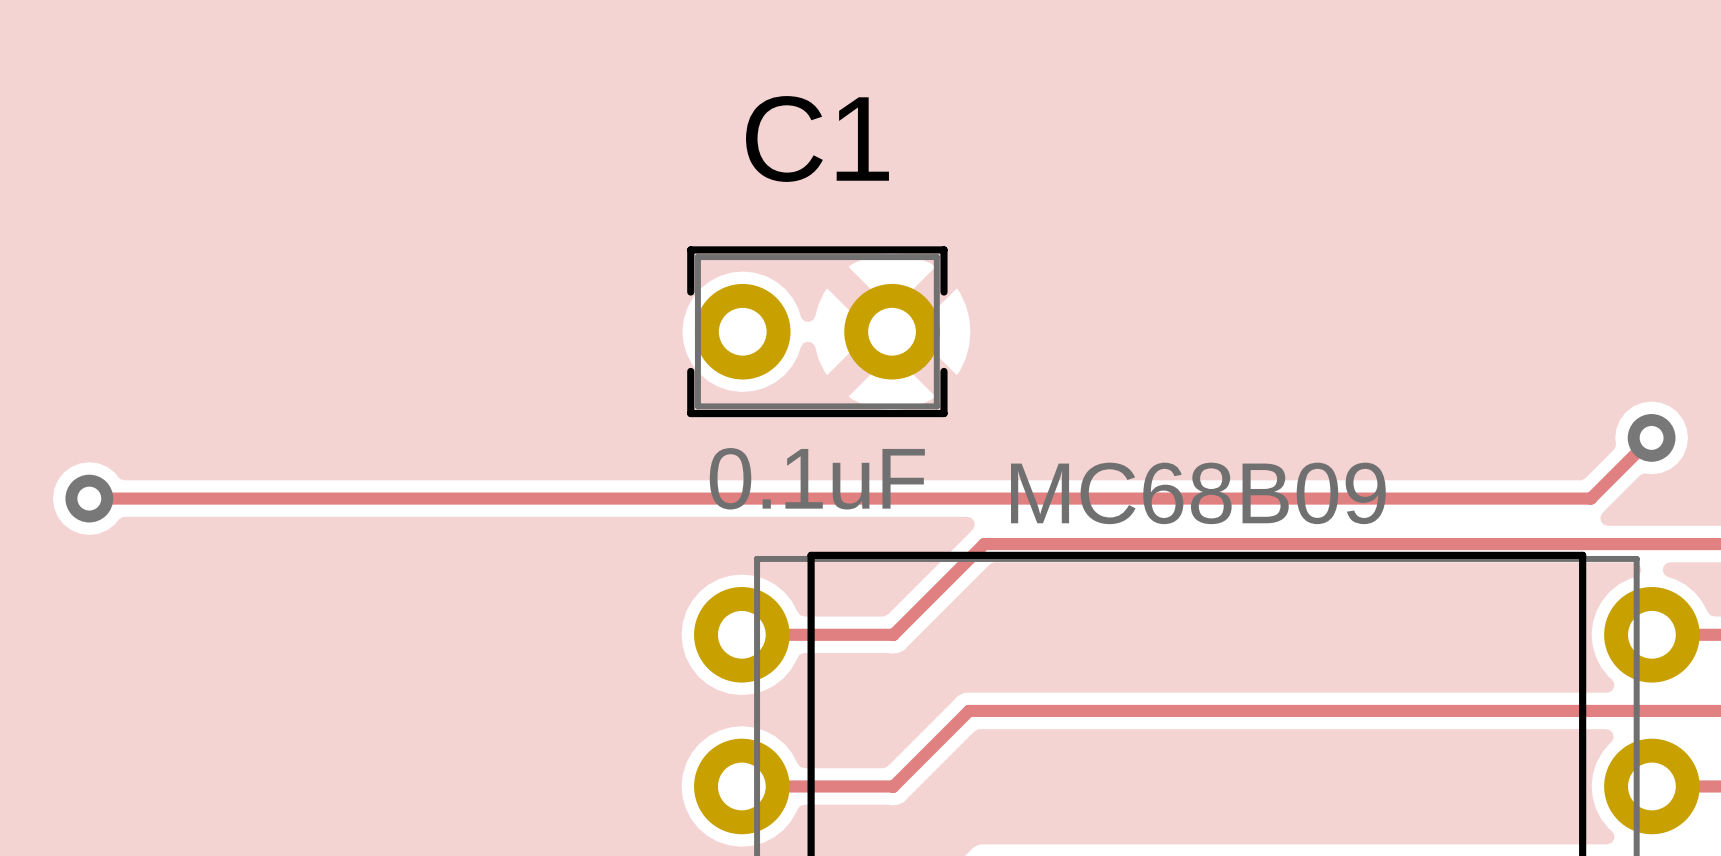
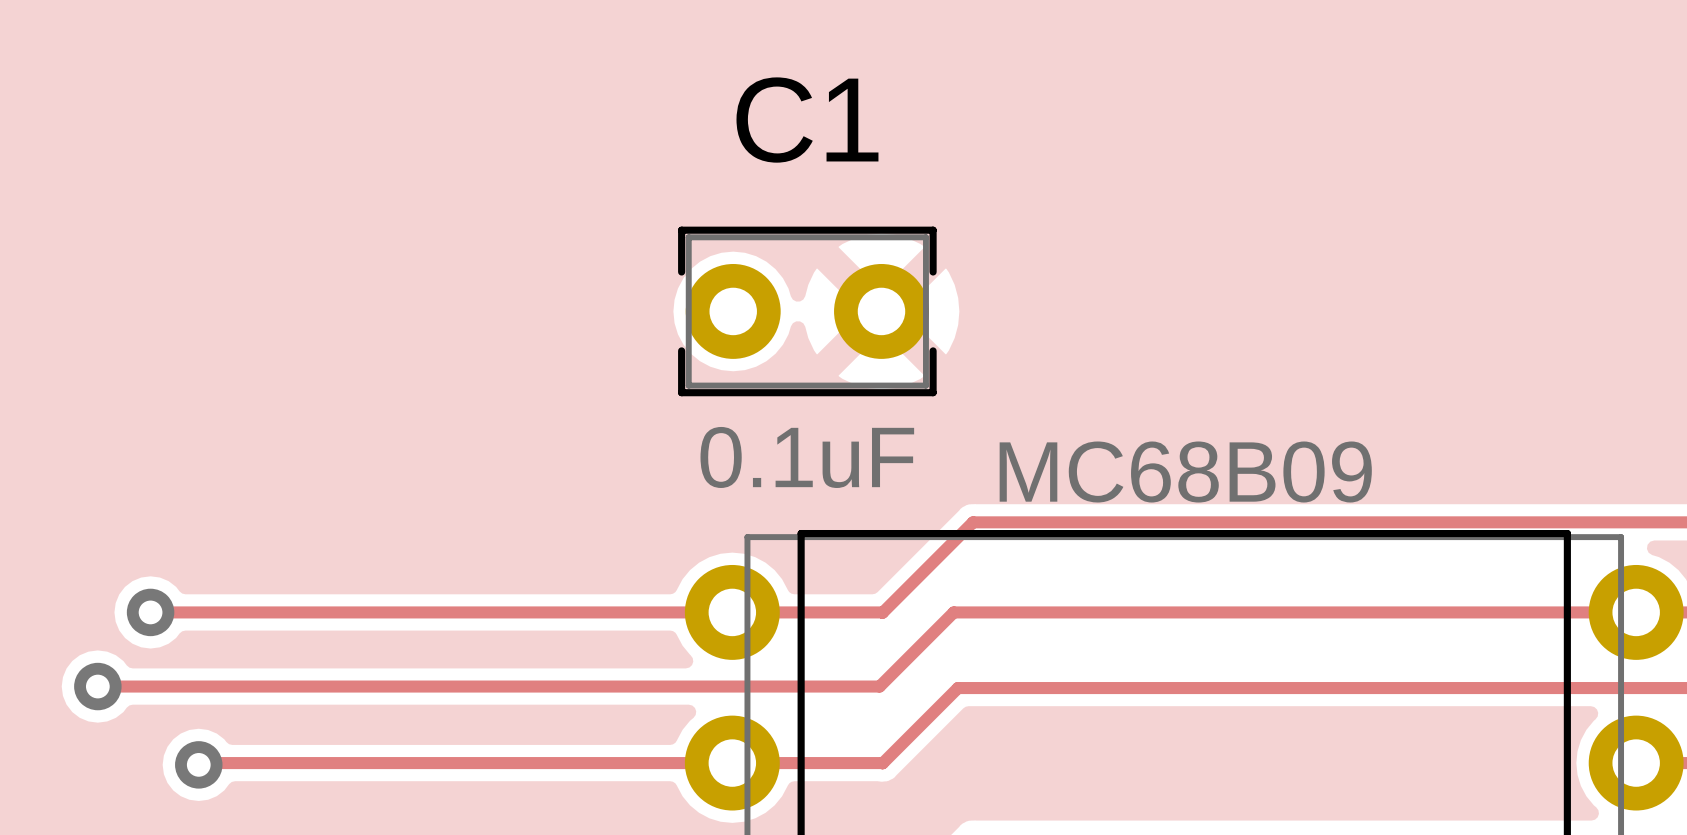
track: (1651, 437) (1590, 498) (89, 498) -> none
via: (1651, 437) -> none
via: (89, 498) -> none
track: none -> (150, 612) (732, 612)
via: none -> (150, 612)
track: none -> (1636, 612) (953, 612) (879, 686) (97, 686)
via: none -> (97, 686)
track: none -> (732, 763) (200, 763) (198, 764)
via: none -> (198, 764)

